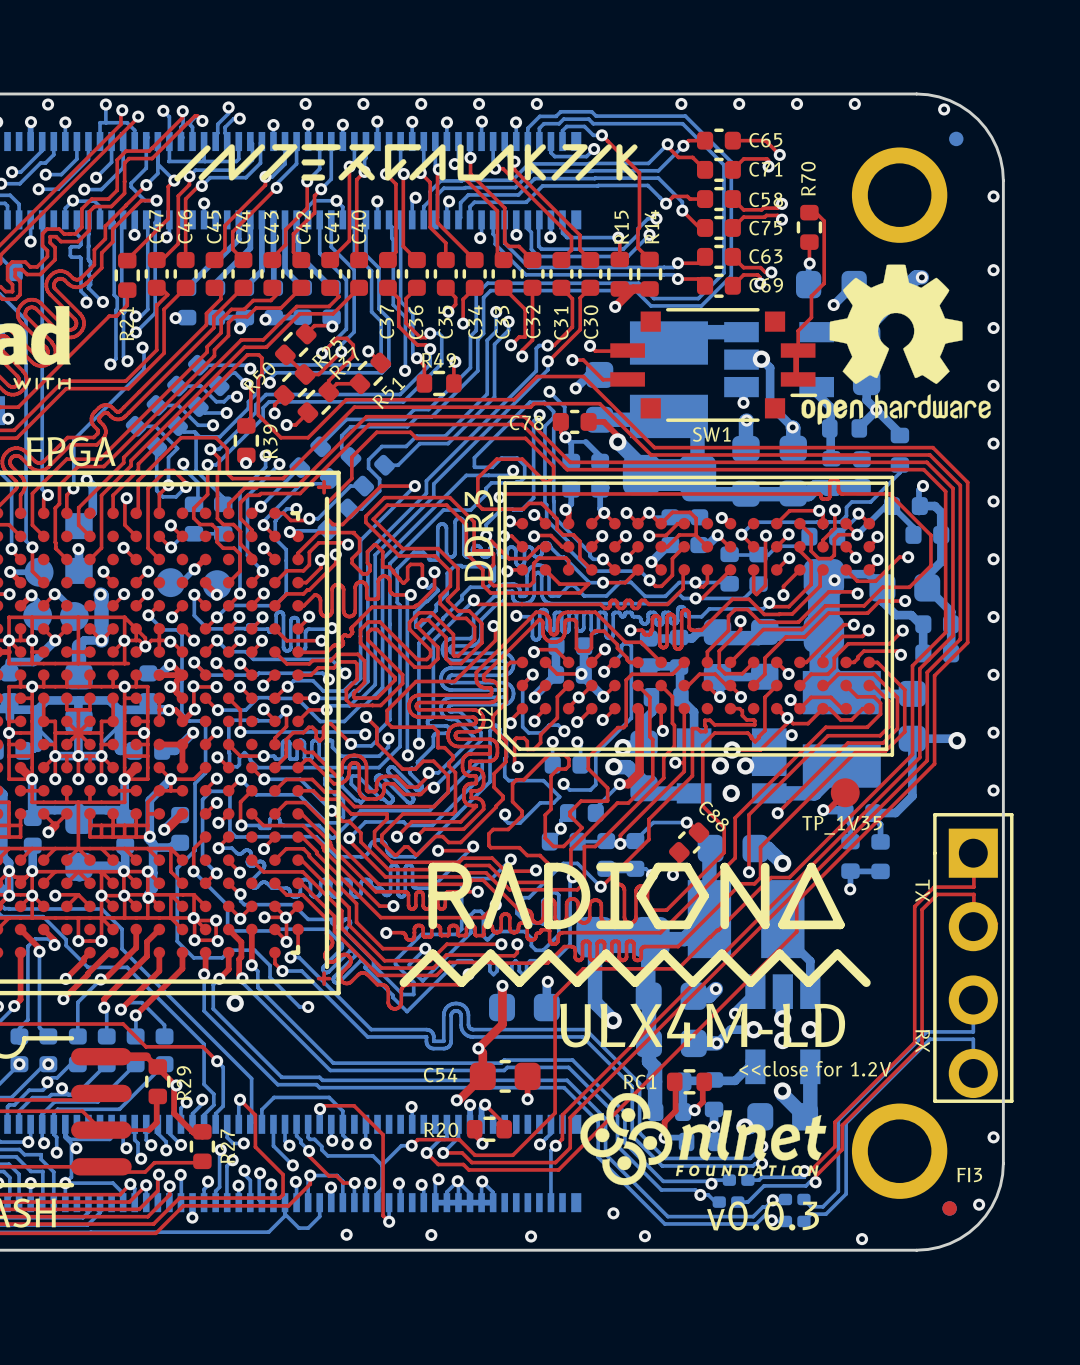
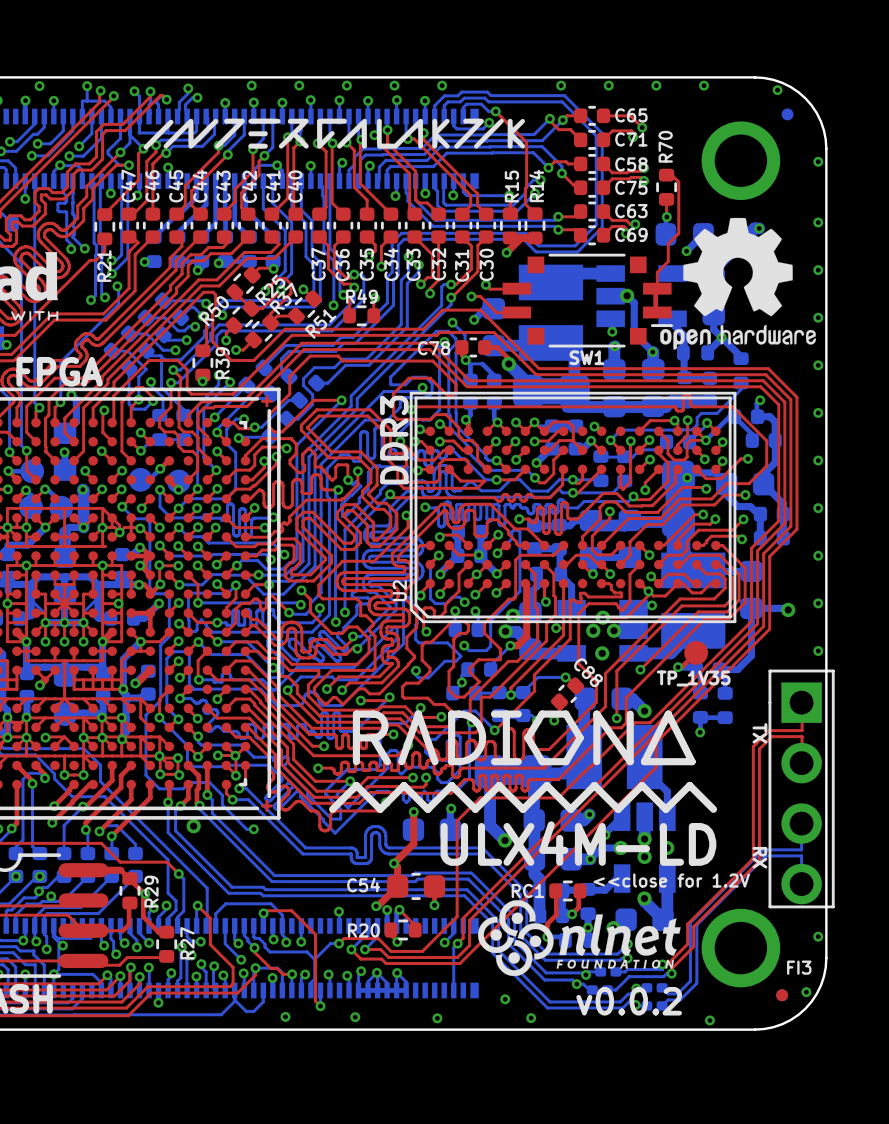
text: v0.0.3 (763, 1215) -> v0.0.2 (629, 1001)

